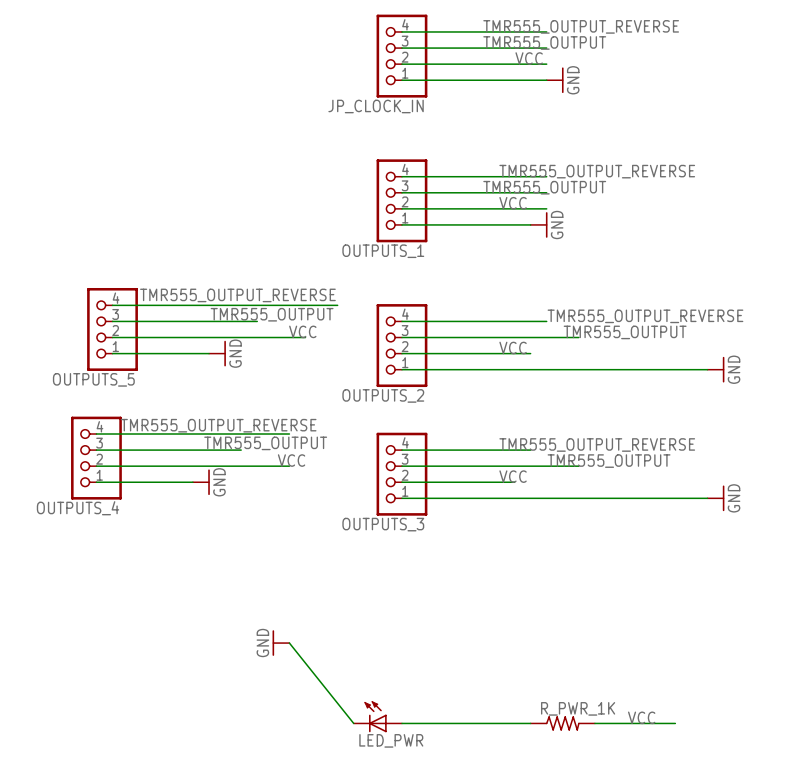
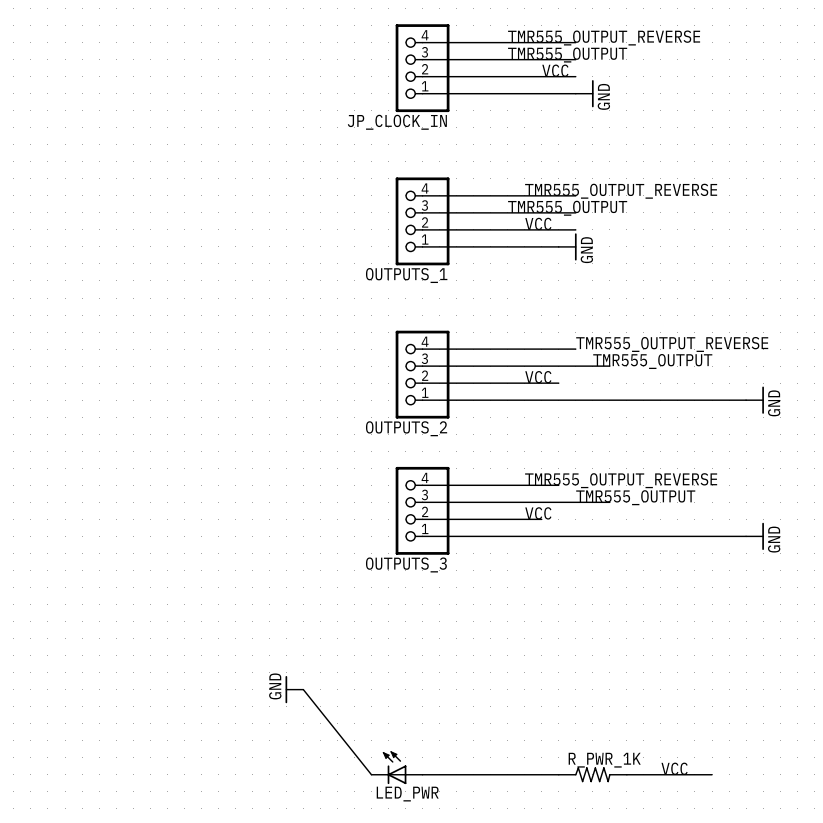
label: TMR555_OUTPUT_REVERSE (237, 295) -> none
wire: (112, 305) (337, 305) -> none
label: TMR555_OUTPUT (272, 314) -> none
wire: (112, 321) (257, 321) -> none
OUTPUTS_5: (112, 329) -> none
label: VCC (302, 331) -> none
wire: (112, 337) (305, 337) -> none
wire: (112, 353) (209, 353) -> none
power symbol: GND (217, 353) -> none
label: TMR555_OUTPUT_REVERSE (218, 425) -> none
wire: (96, 434) (289, 434) -> none
label: TMR555_OUTPUT (265, 443) -> none
wire: (96, 450) (241, 450) -> none
OUTPUTS_4: (96, 458) -> none
label: VCC (291, 460) -> none
wire: (96, 466) (289, 466) -> none
wire: (96, 482) (192, 482) -> none
power symbol: GND (201, 482) -> none

